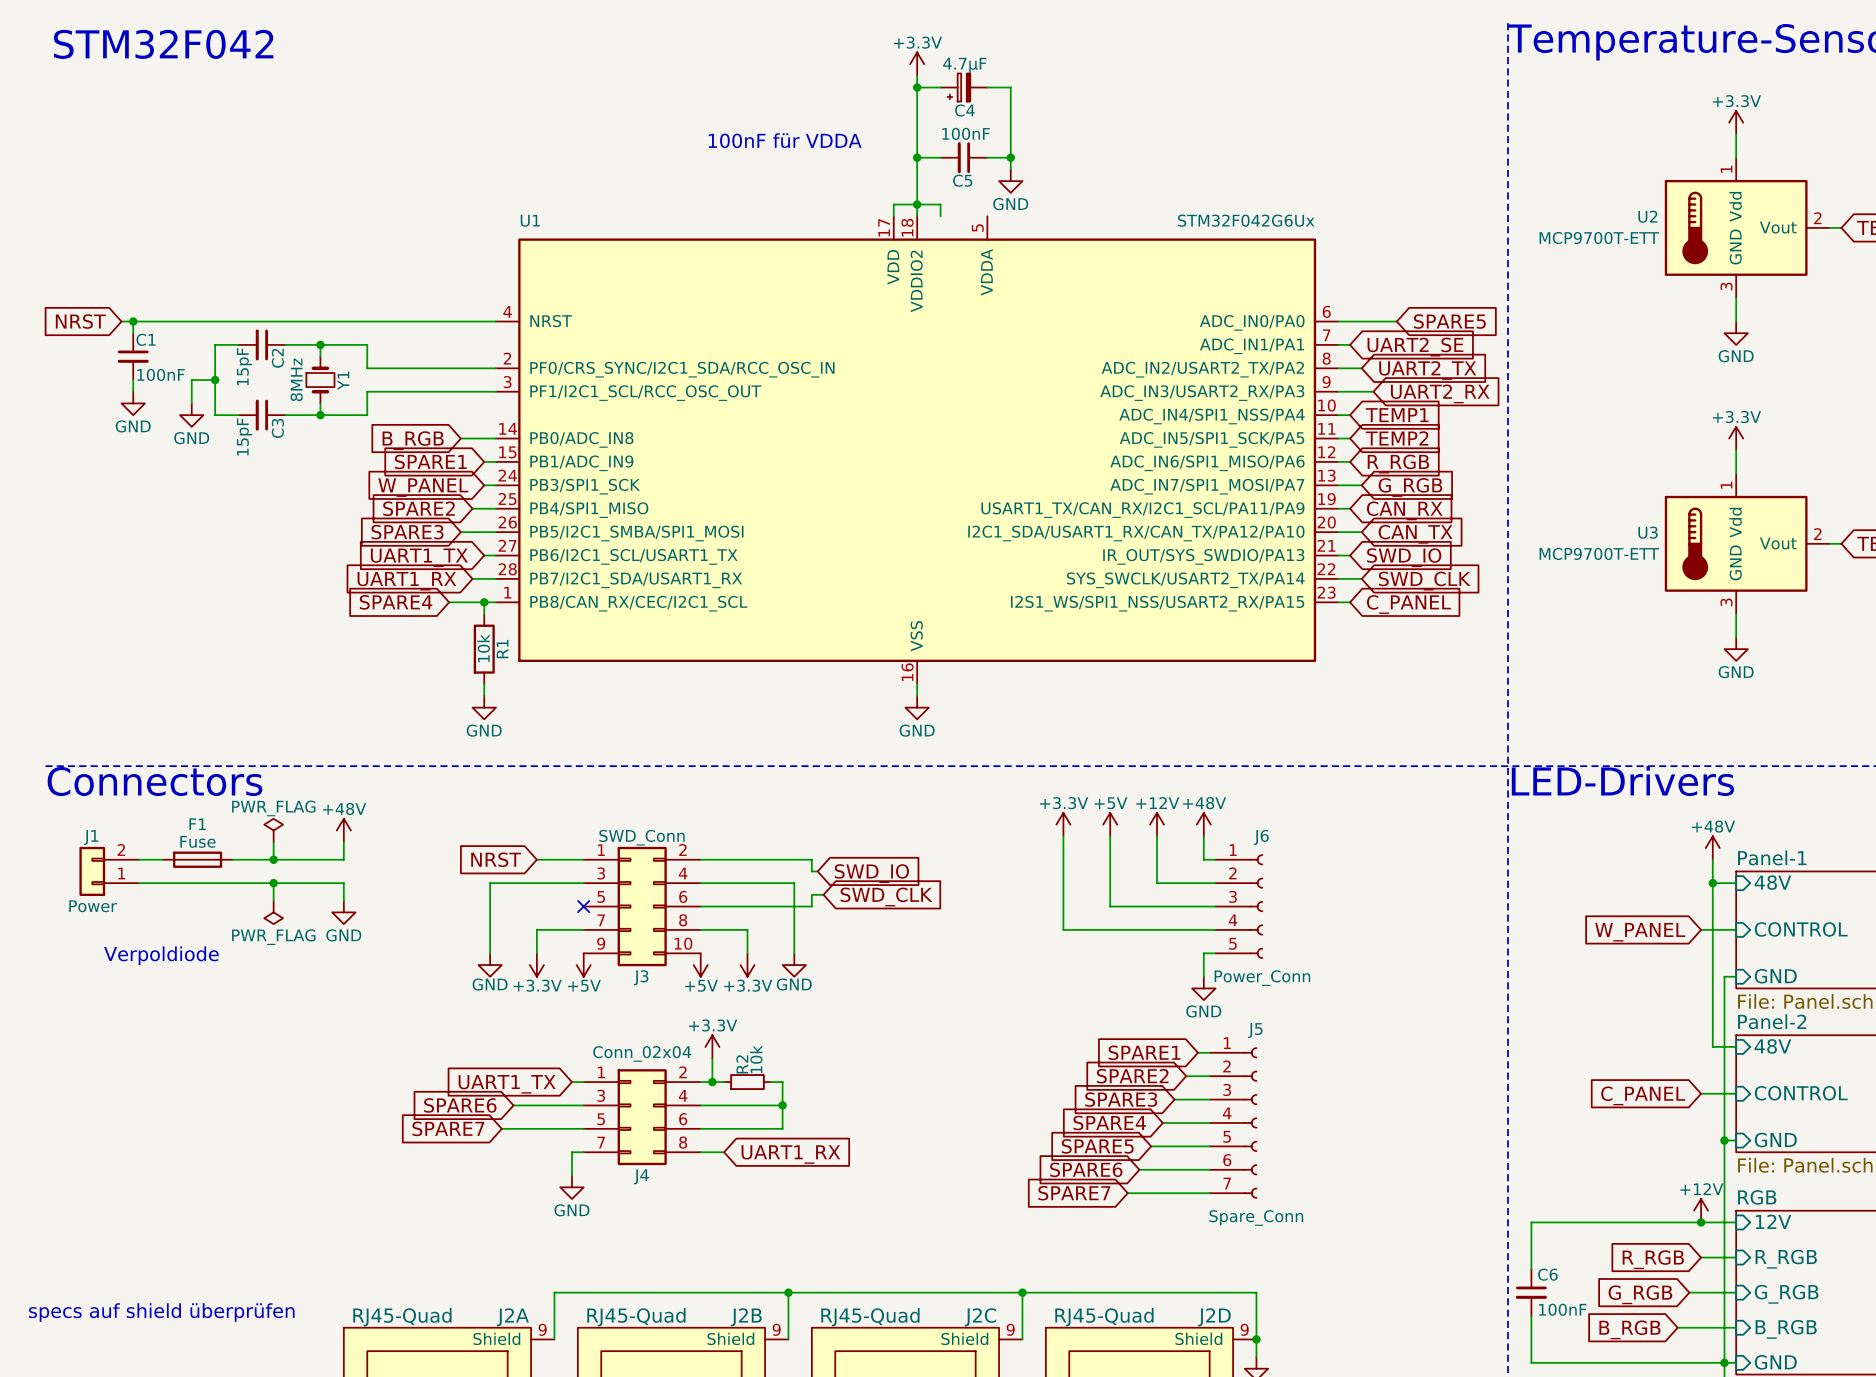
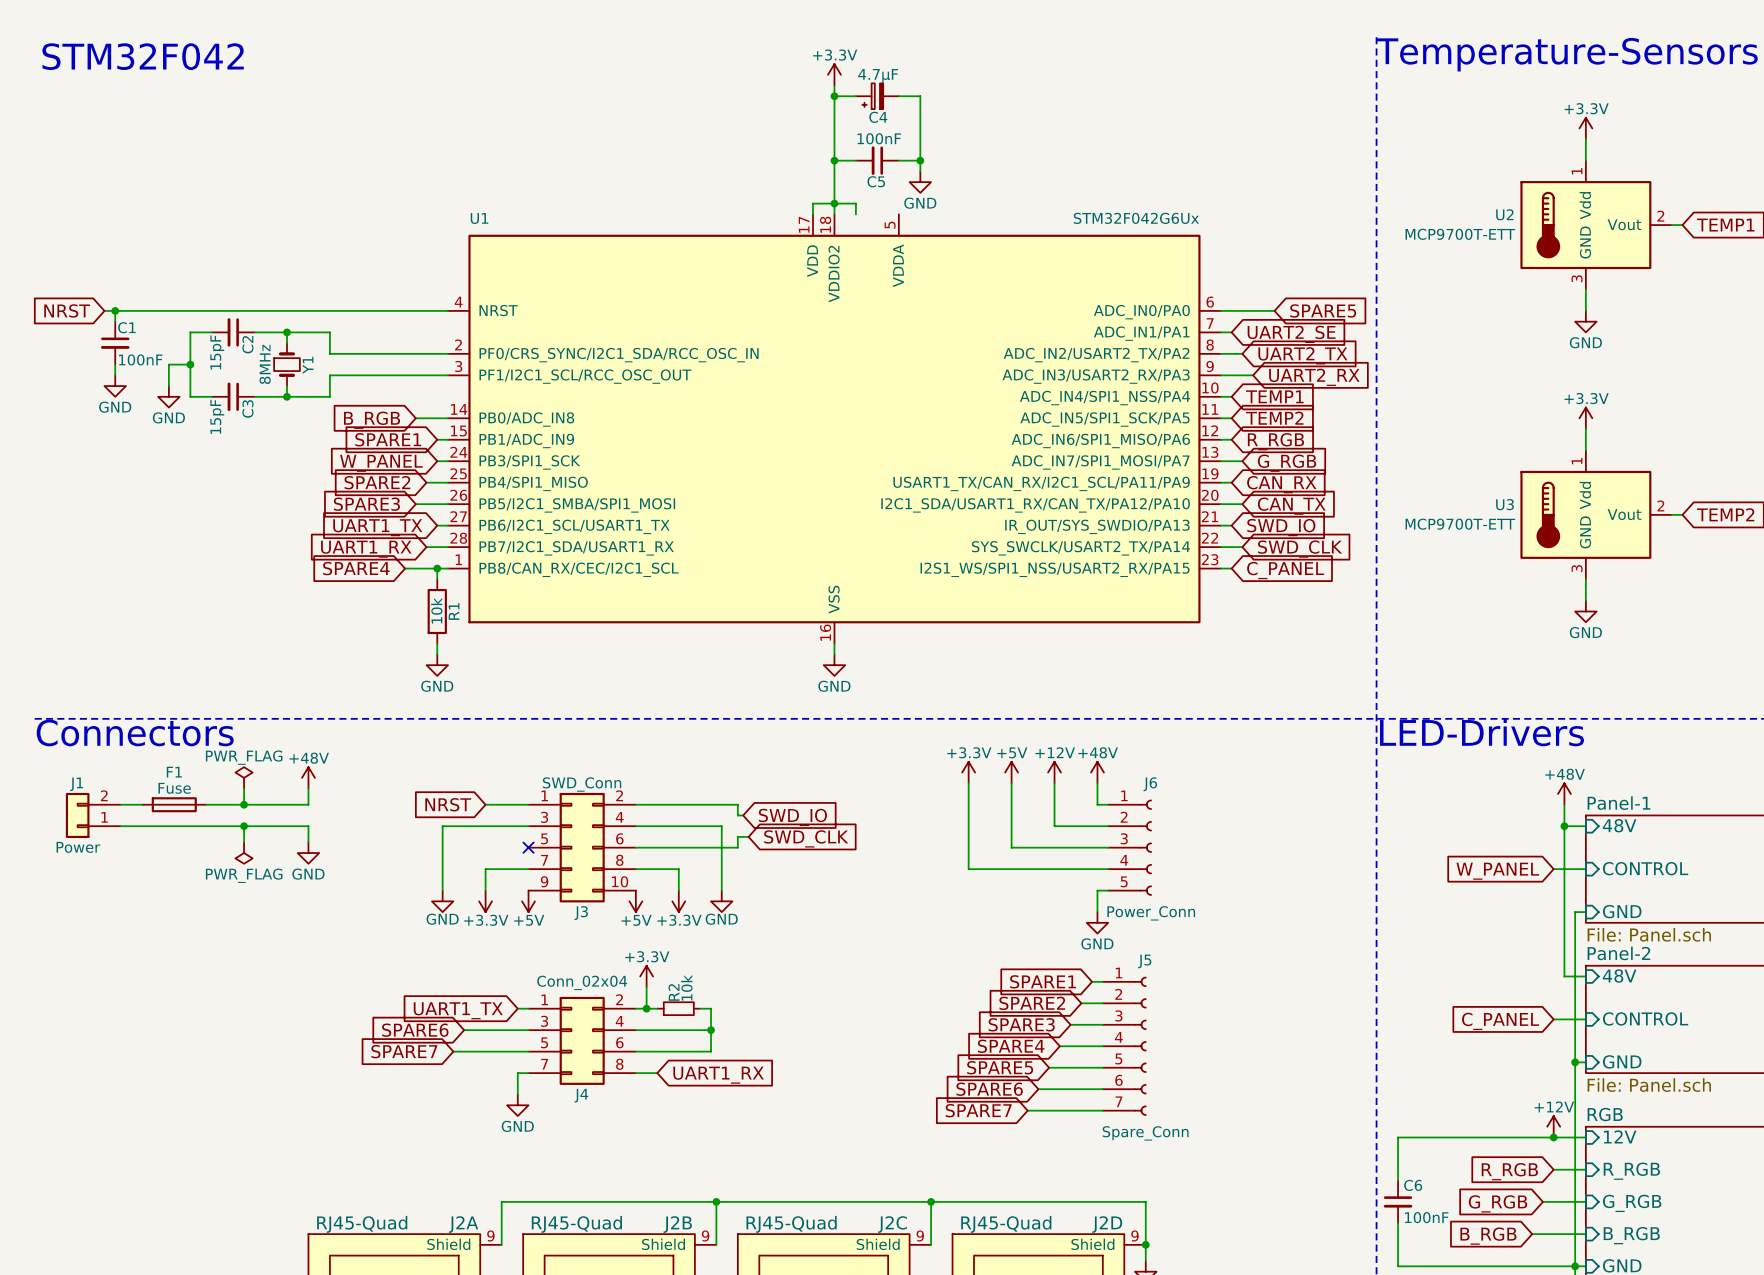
text: 100nF für VDDA (785, 140) -> none
text: Verpoldiode (161, 955) -> none
text: specs auf shield überprüfen (161, 1312) -> none

